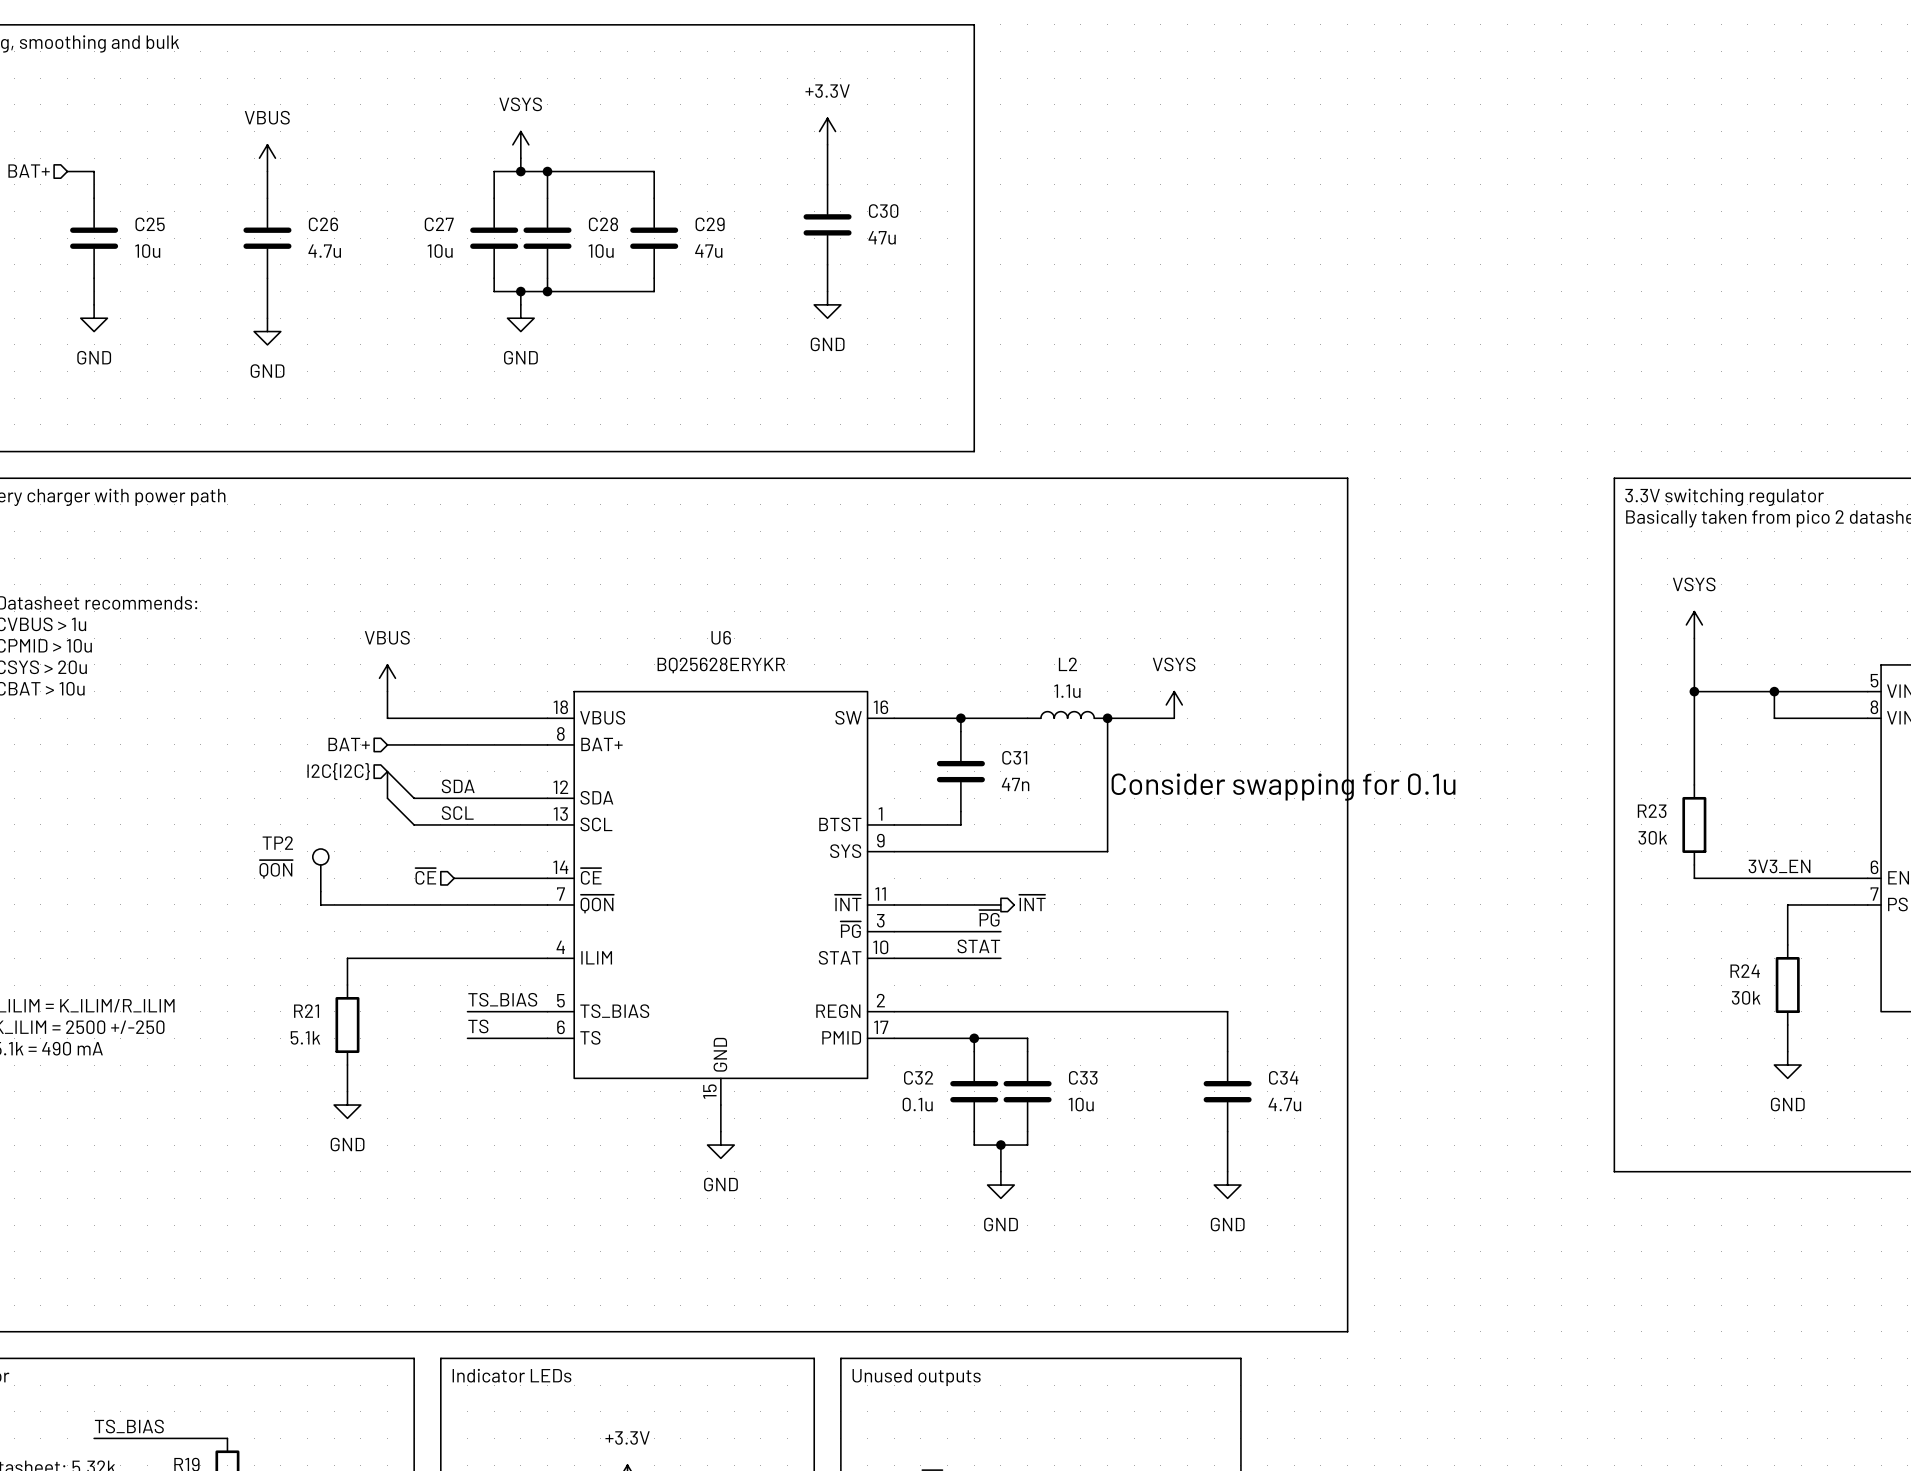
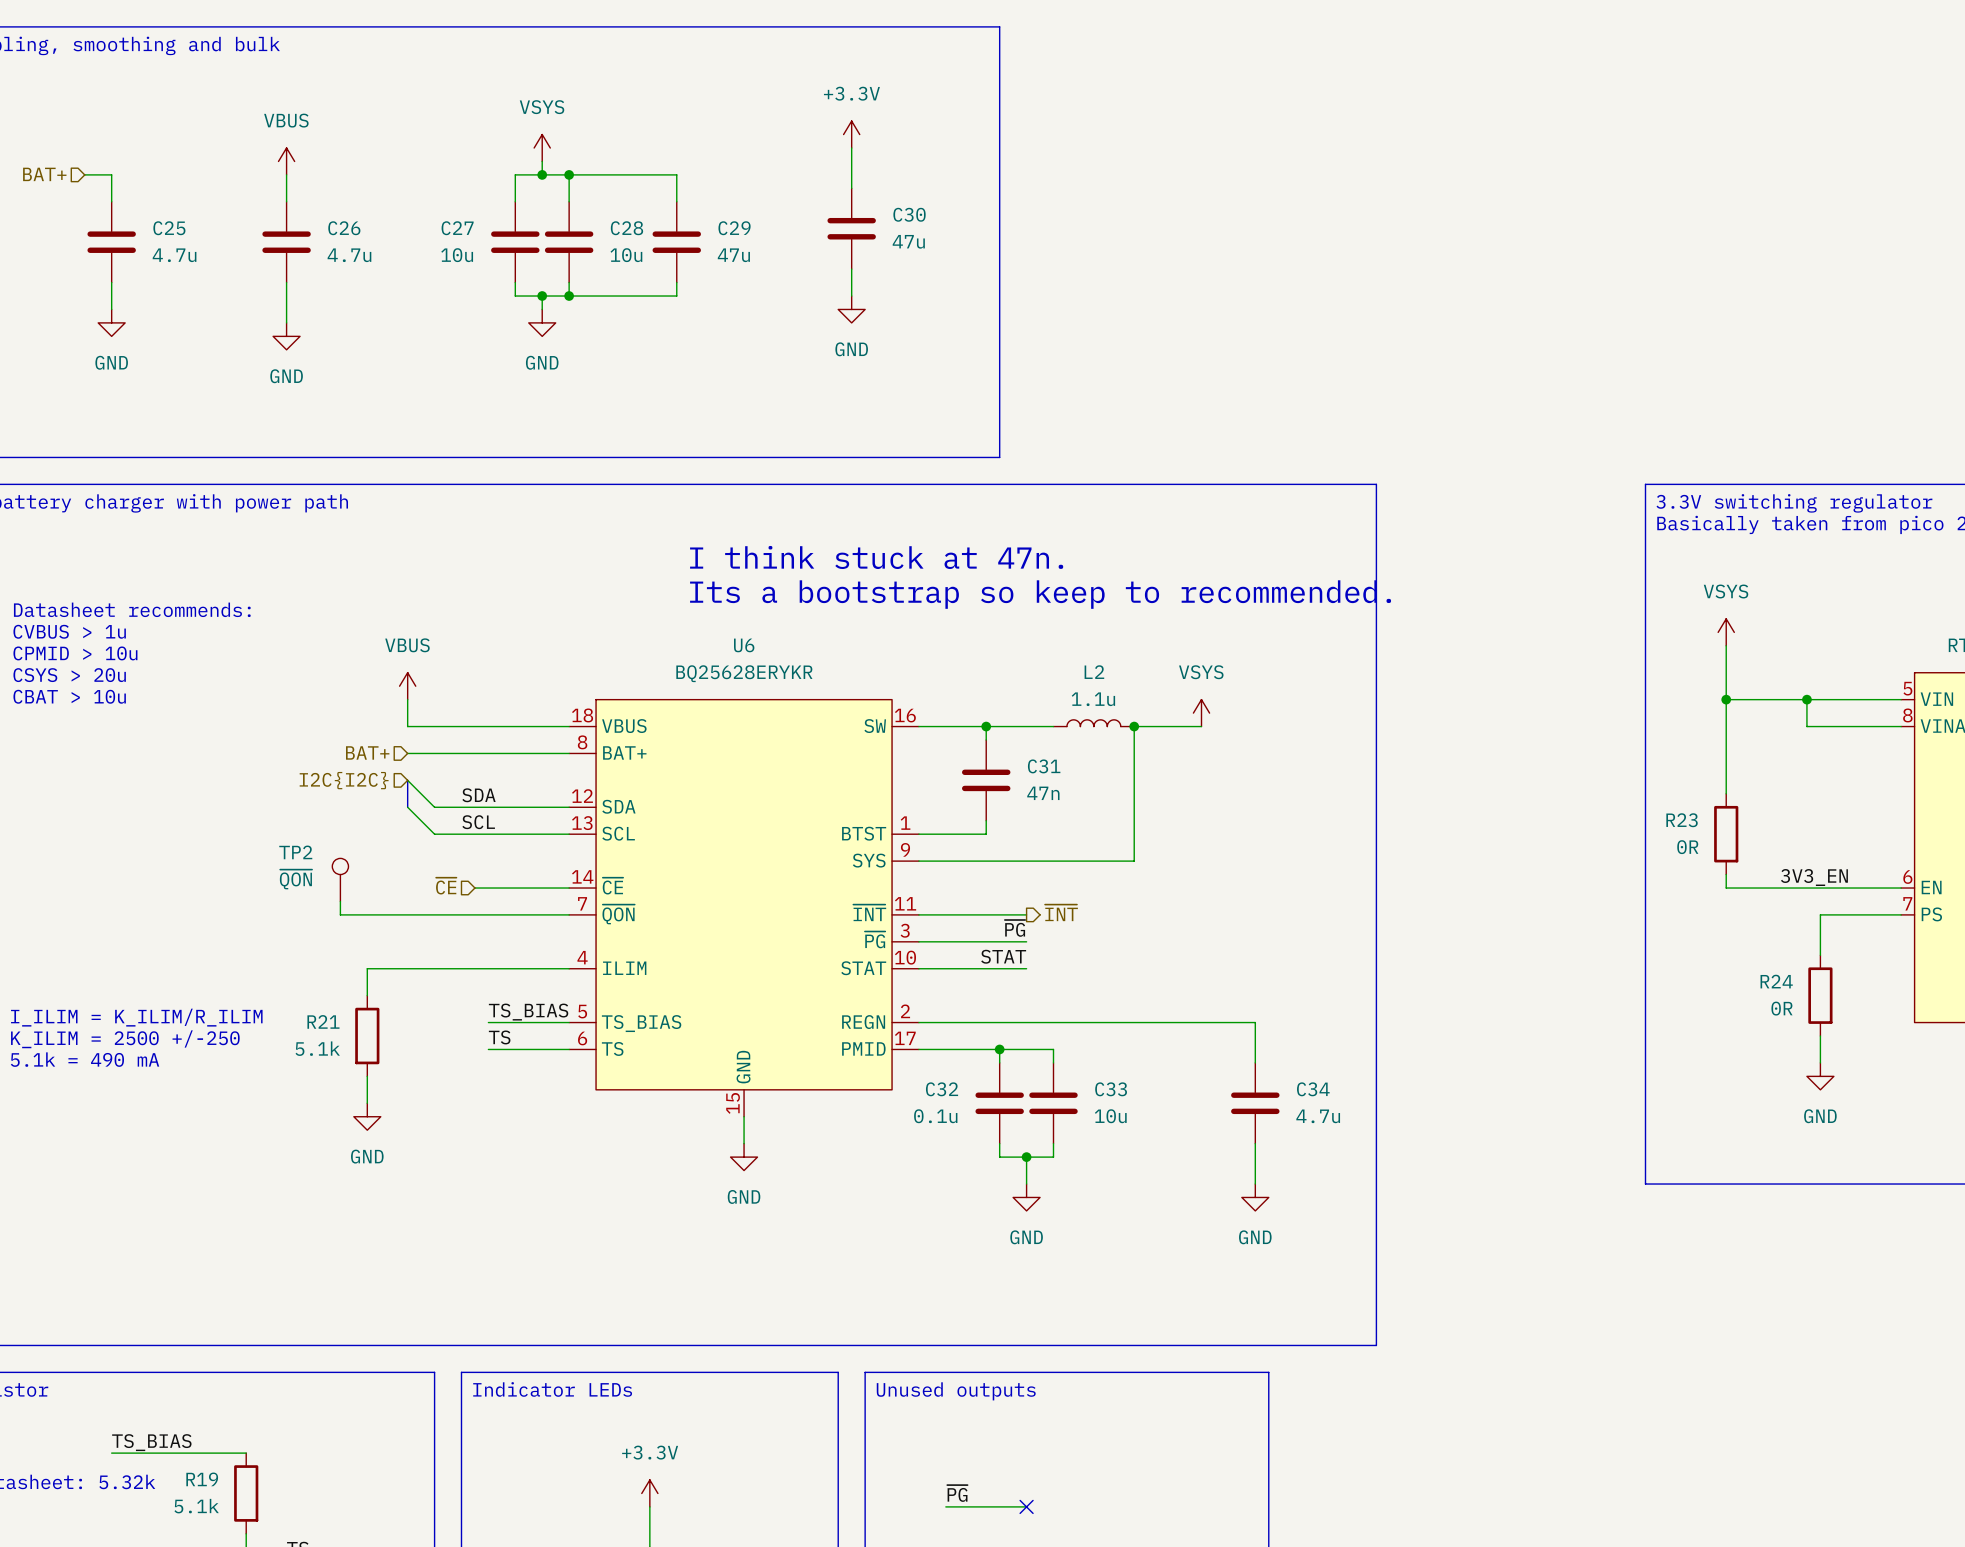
C25 value: 10u (147, 251) -> 4.7u (174, 255)
text: none -> I think stuck at 47n. (876, 557)
text: none -> Its a bootstrap so keep to recommended. (1040, 594)
text: Consider swapping for 0.1u (1283, 787) -> none
R23 value: 30k (1652, 837) -> 0R (1687, 847)
R24 value: 30k (1746, 997) -> 0R (1781, 1008)

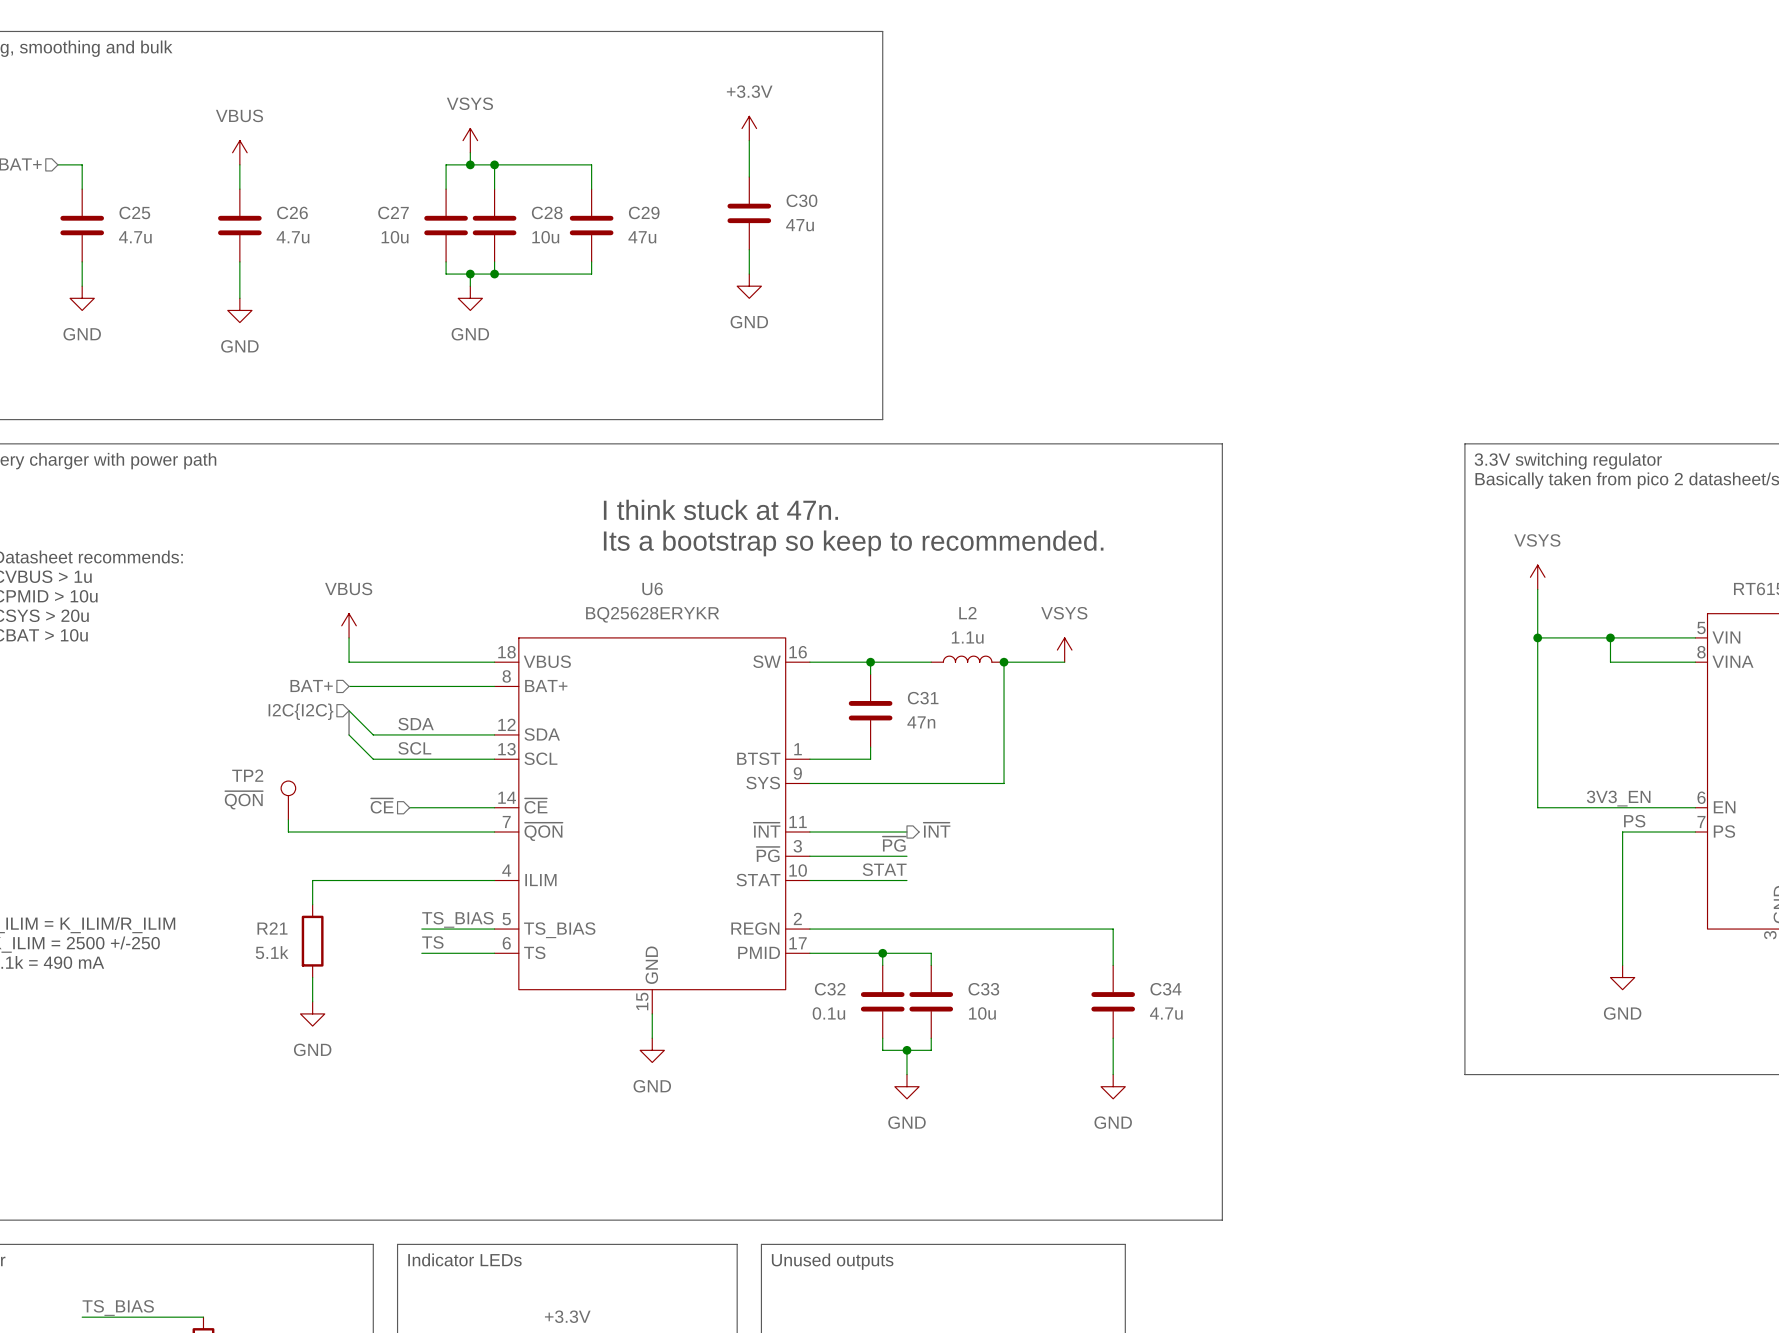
wire: none -> (1537, 722) (1537, 795)
R23: 0R (1726, 834) -> none
label: none -> PS (1634, 821)
wire: none -> (1622, 868) (1622, 941)
R24: 0R (1820, 995) -> none

